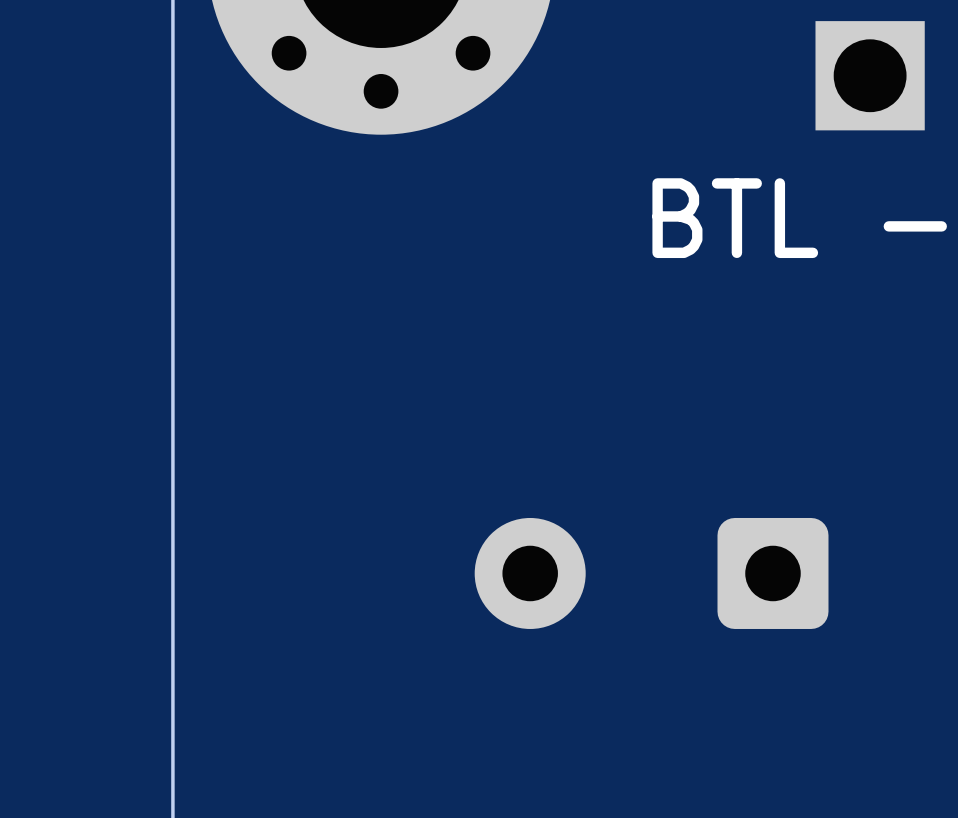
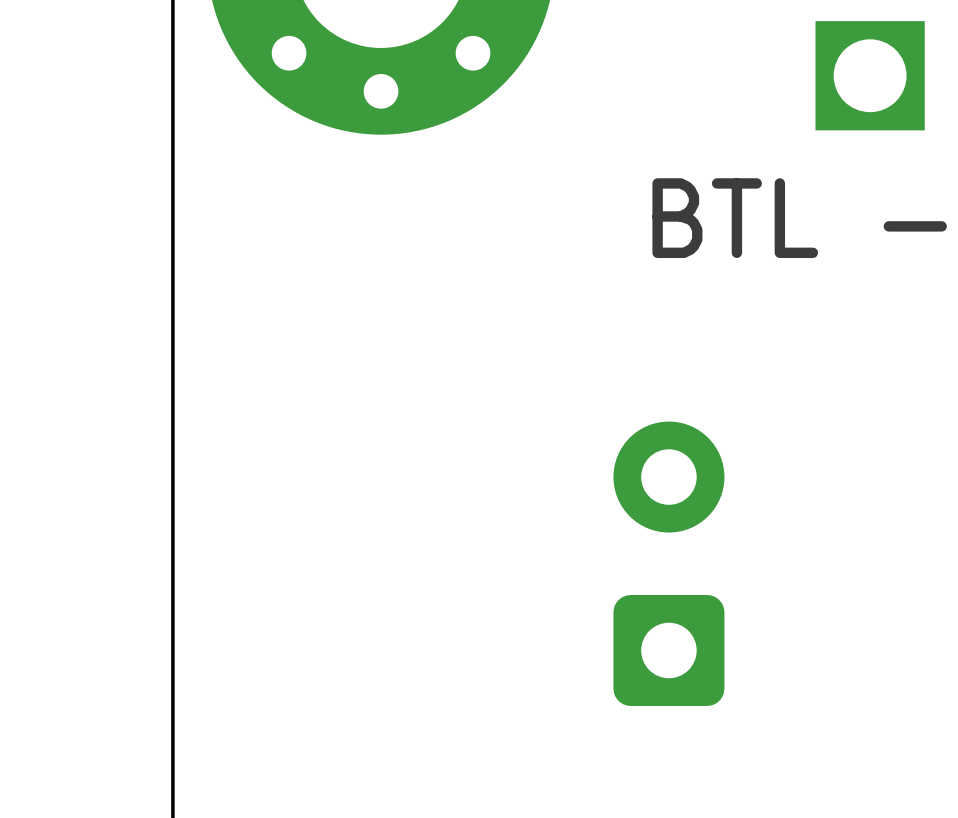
part footprint: [474, 517, 829, 629] -> [613, 421, 725, 706]

